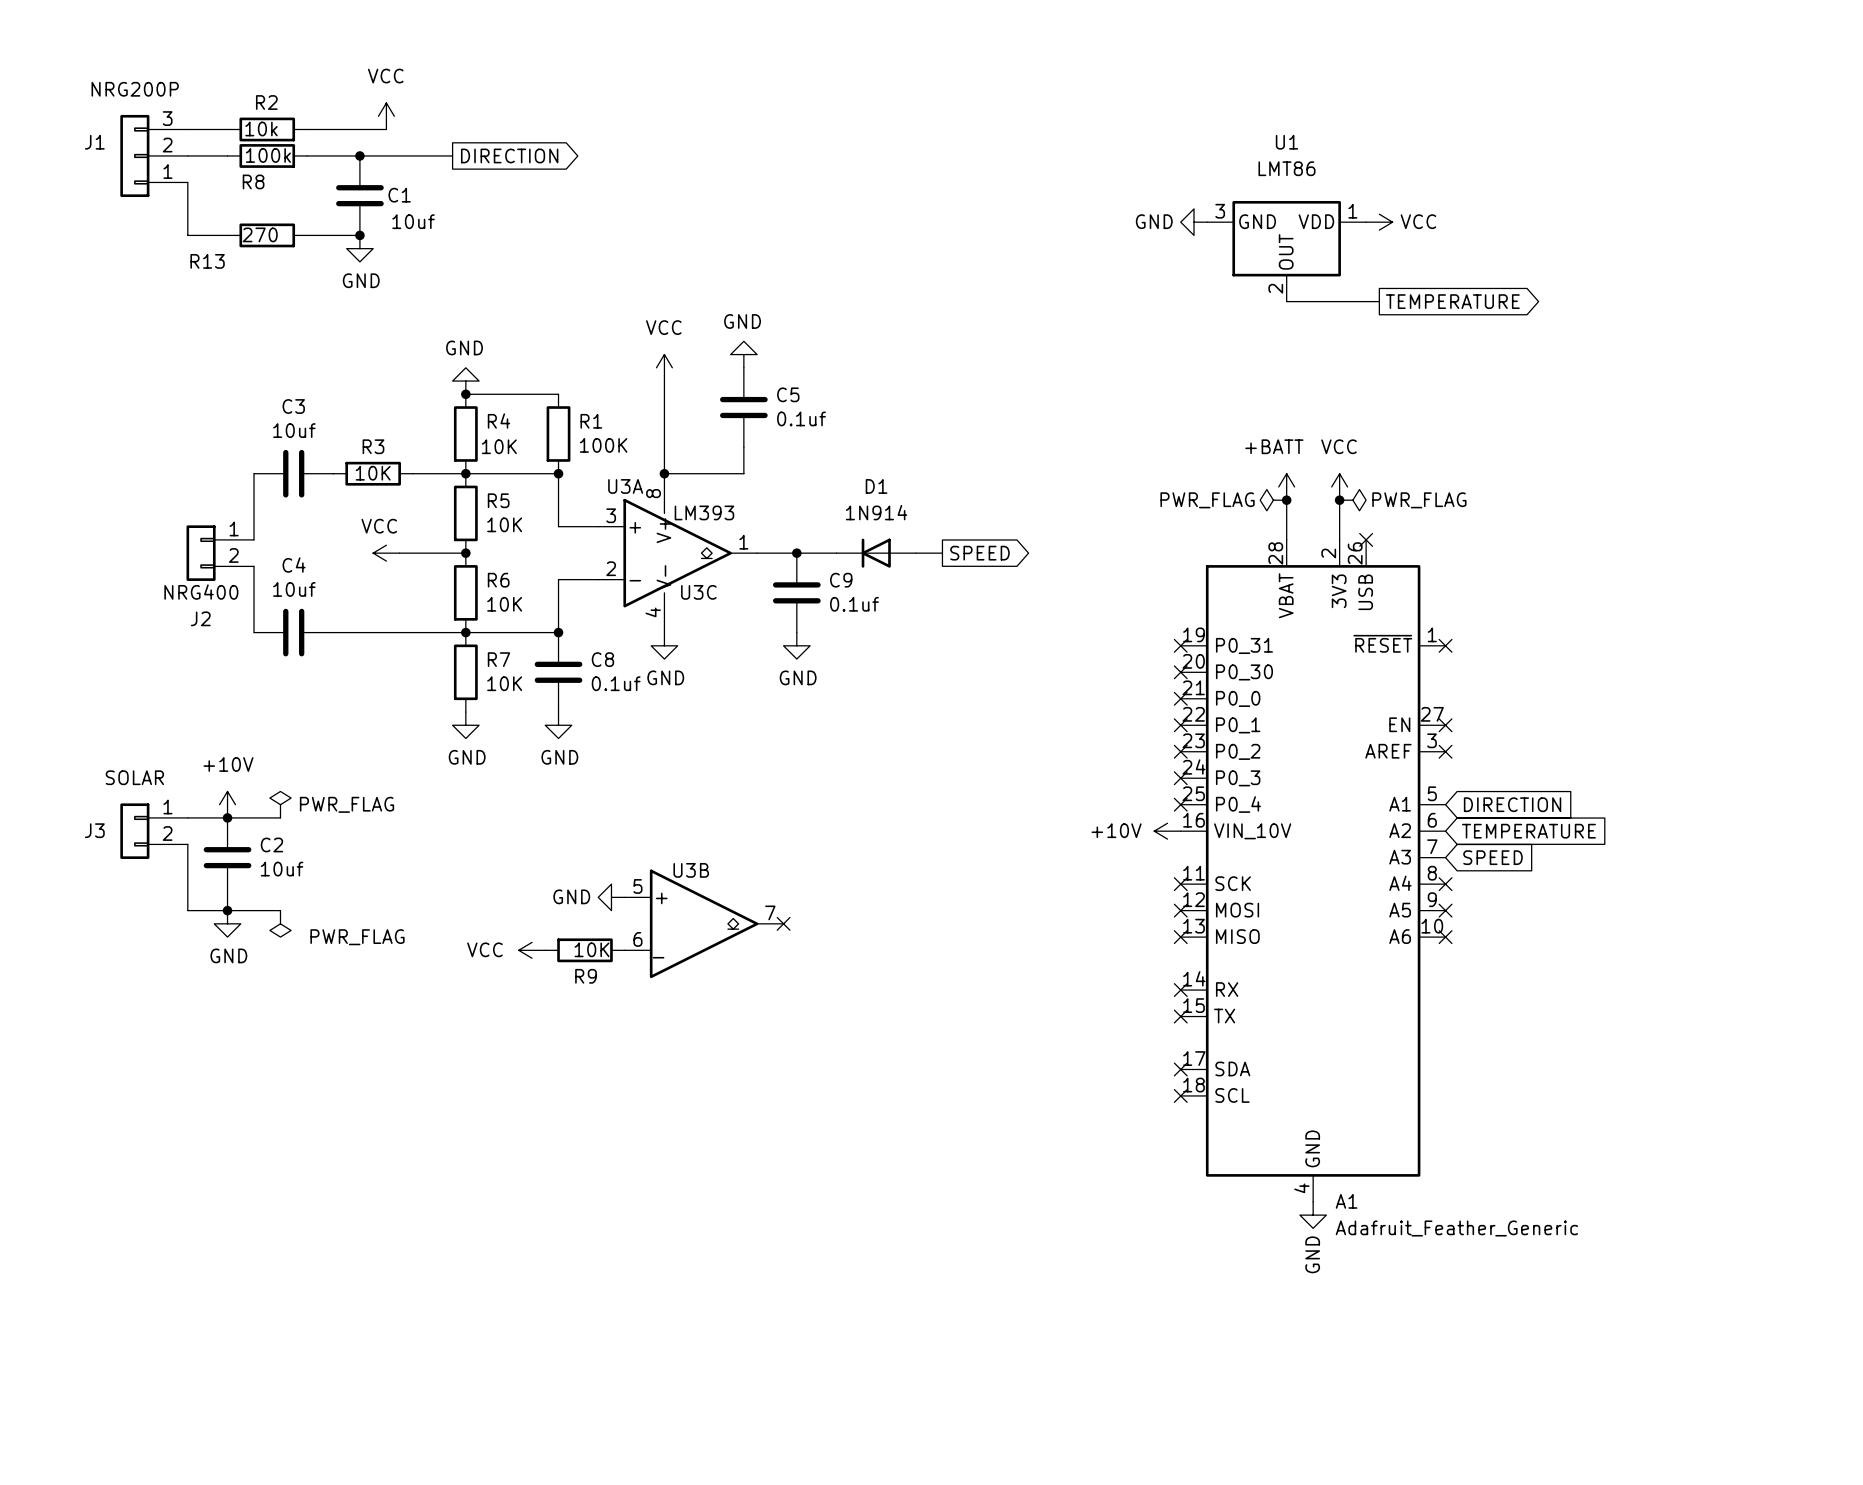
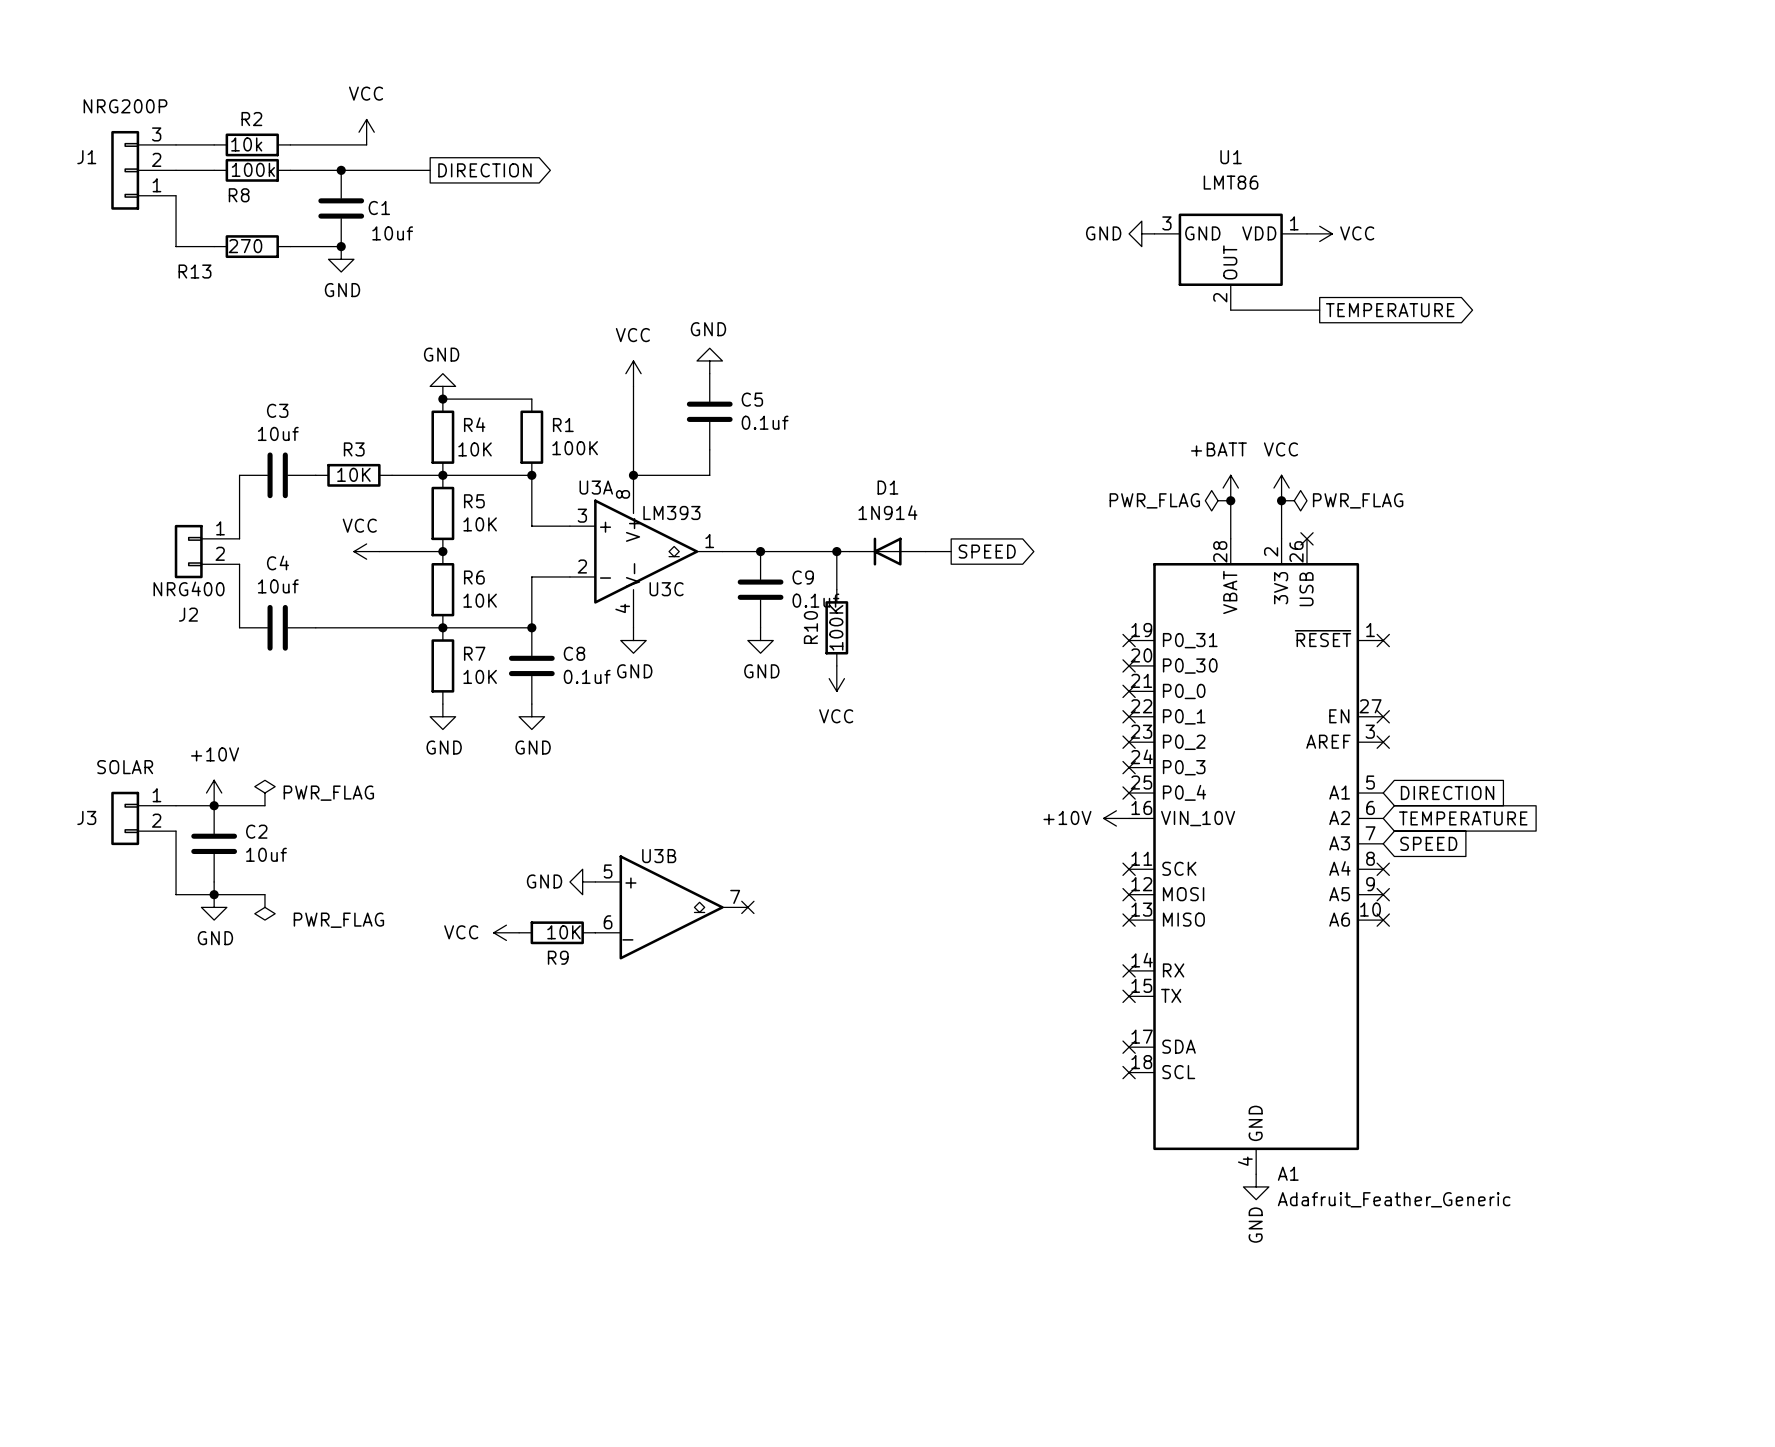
wire: none -> (836, 551) (836, 589)
D1 position: (876, 553) -> (887, 551)
junction: none -> (836, 551)
global label position: SPEED (979, 553) -> SPEED (987, 551)
R10: none -> 100K (836, 627)
power symbol: none -> VCC (836, 678)

